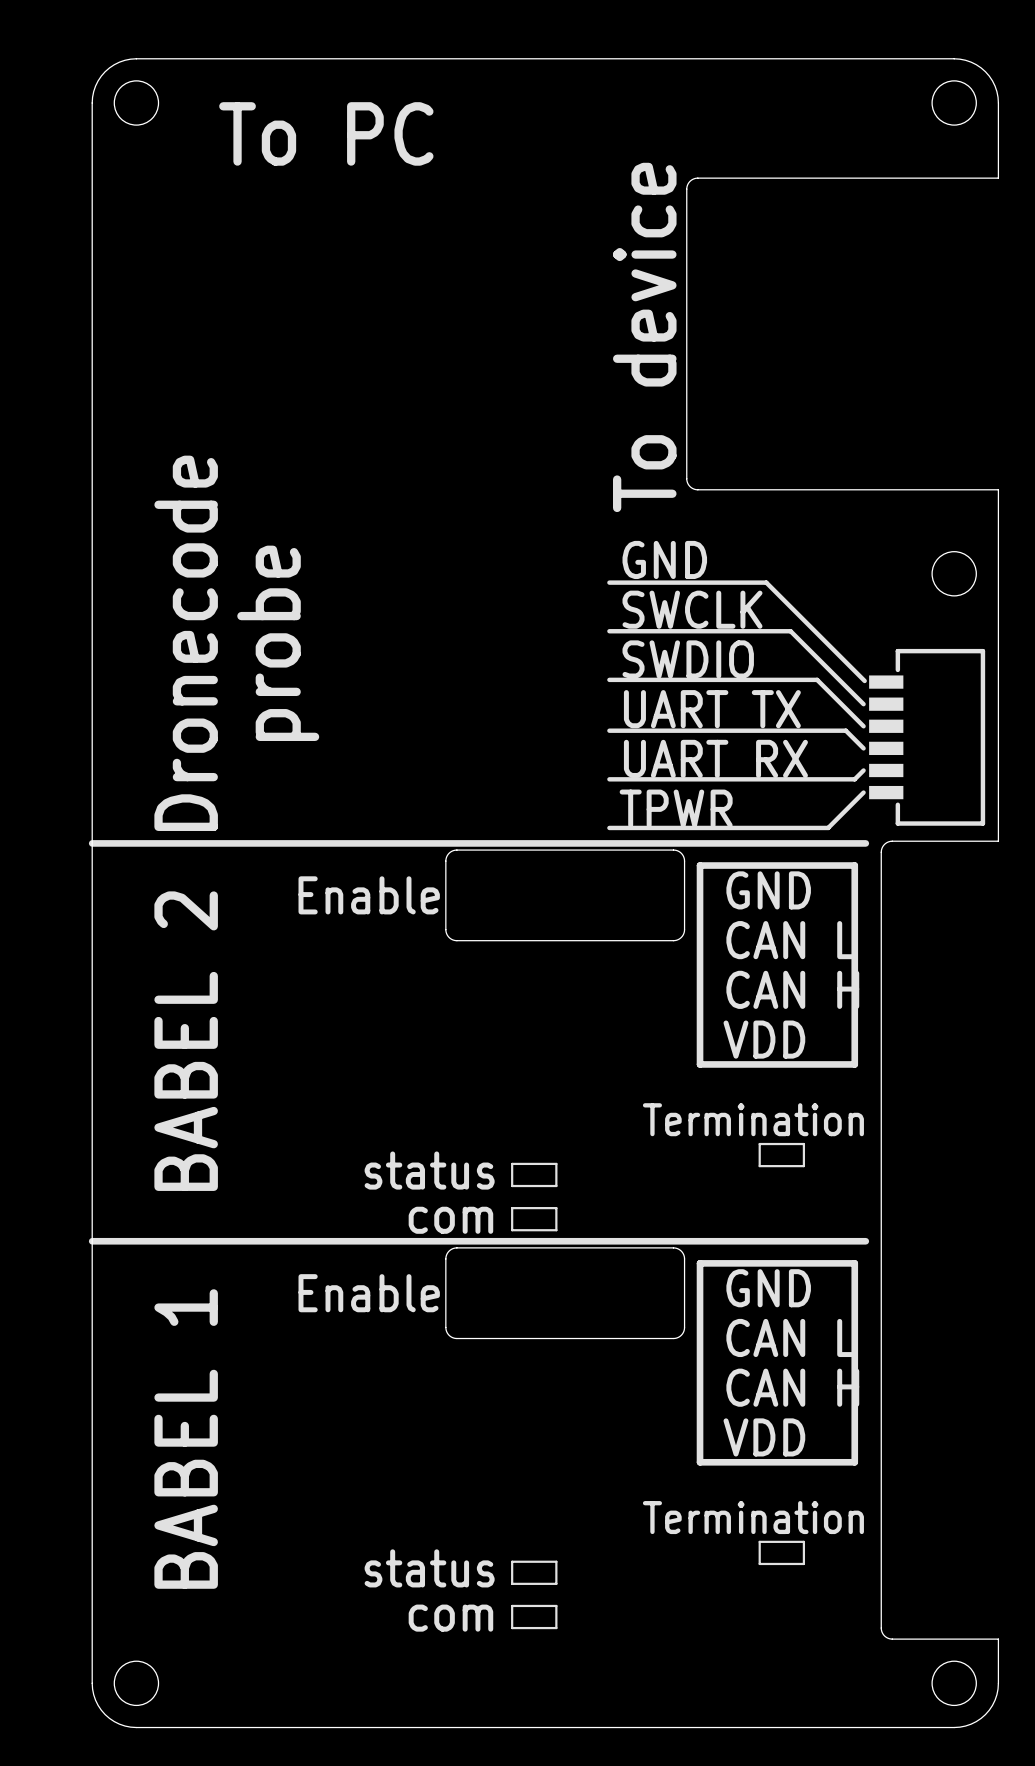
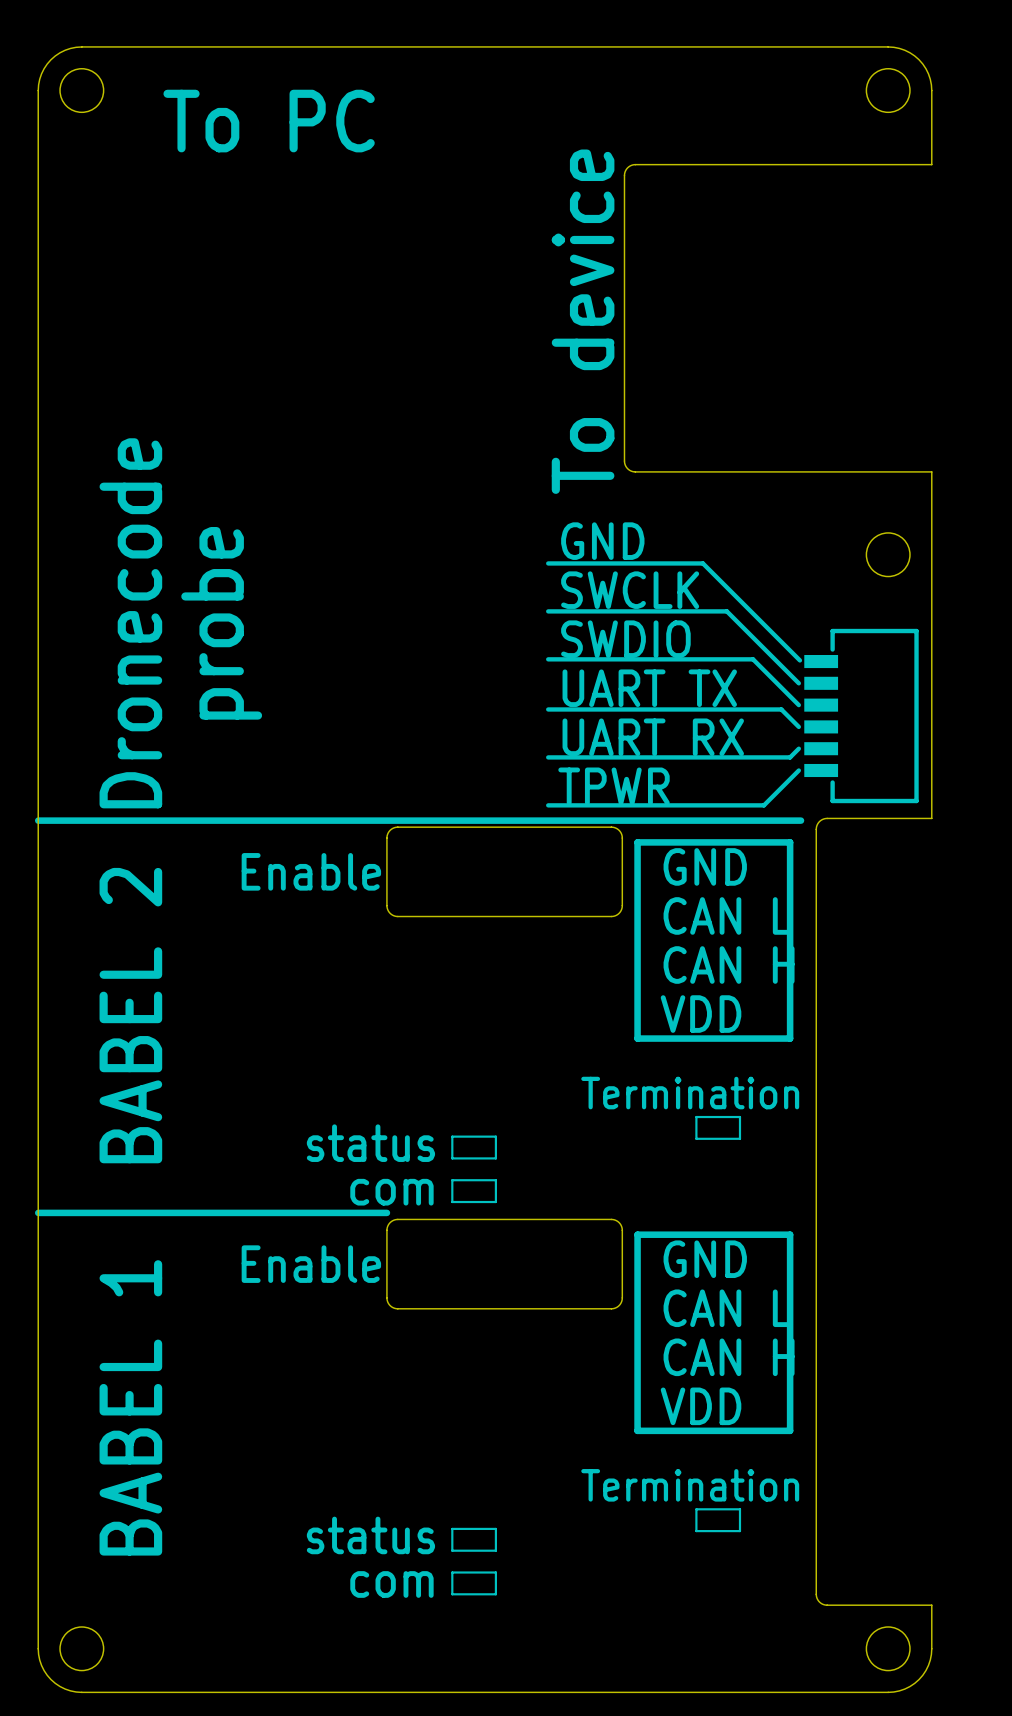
line: (445, 1241) (865, 1241) -> none

